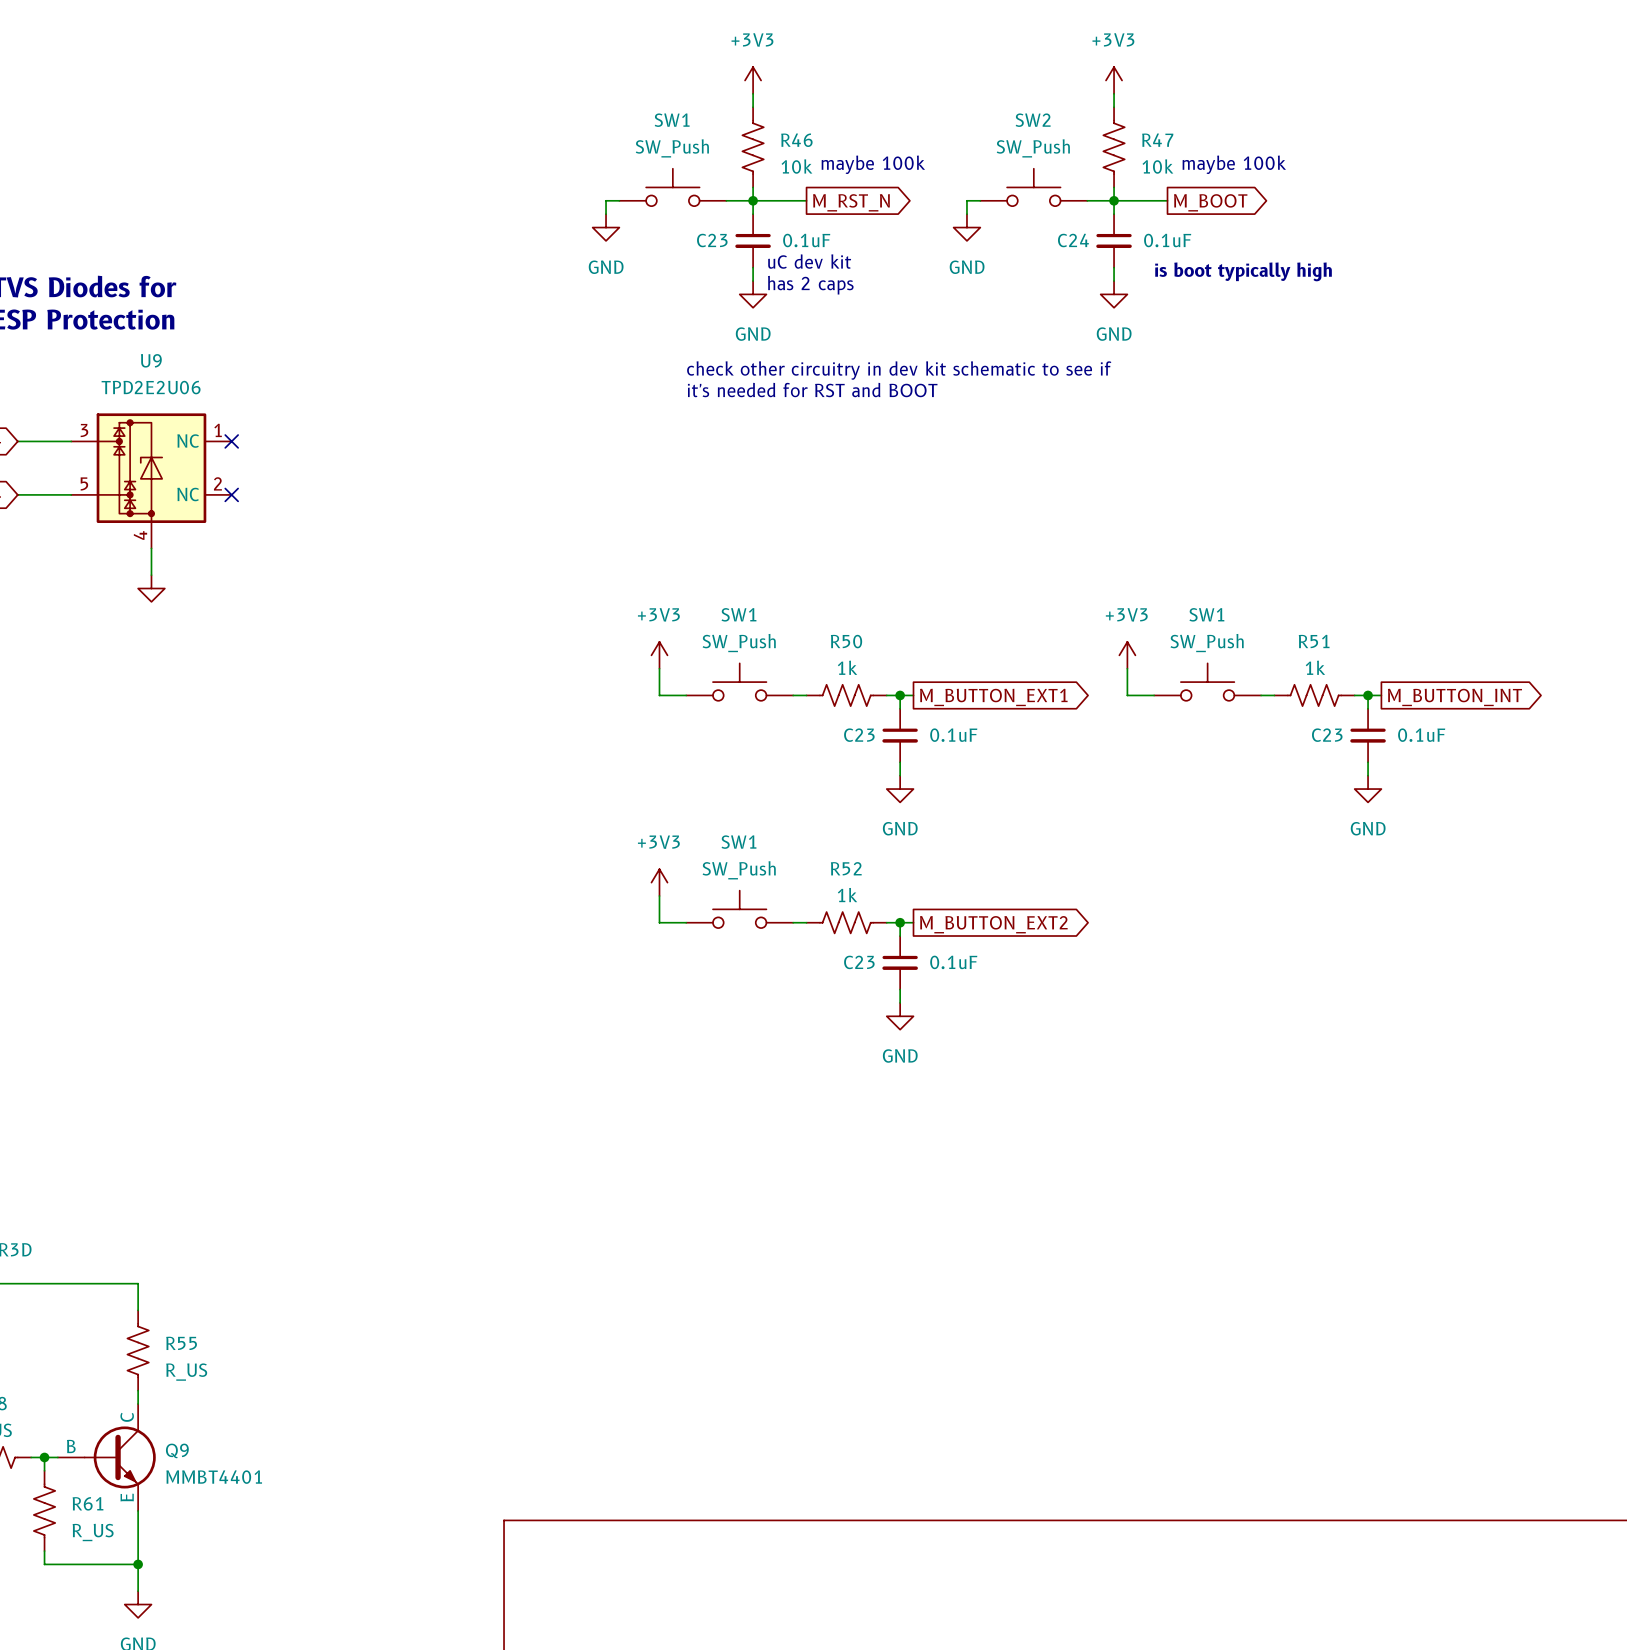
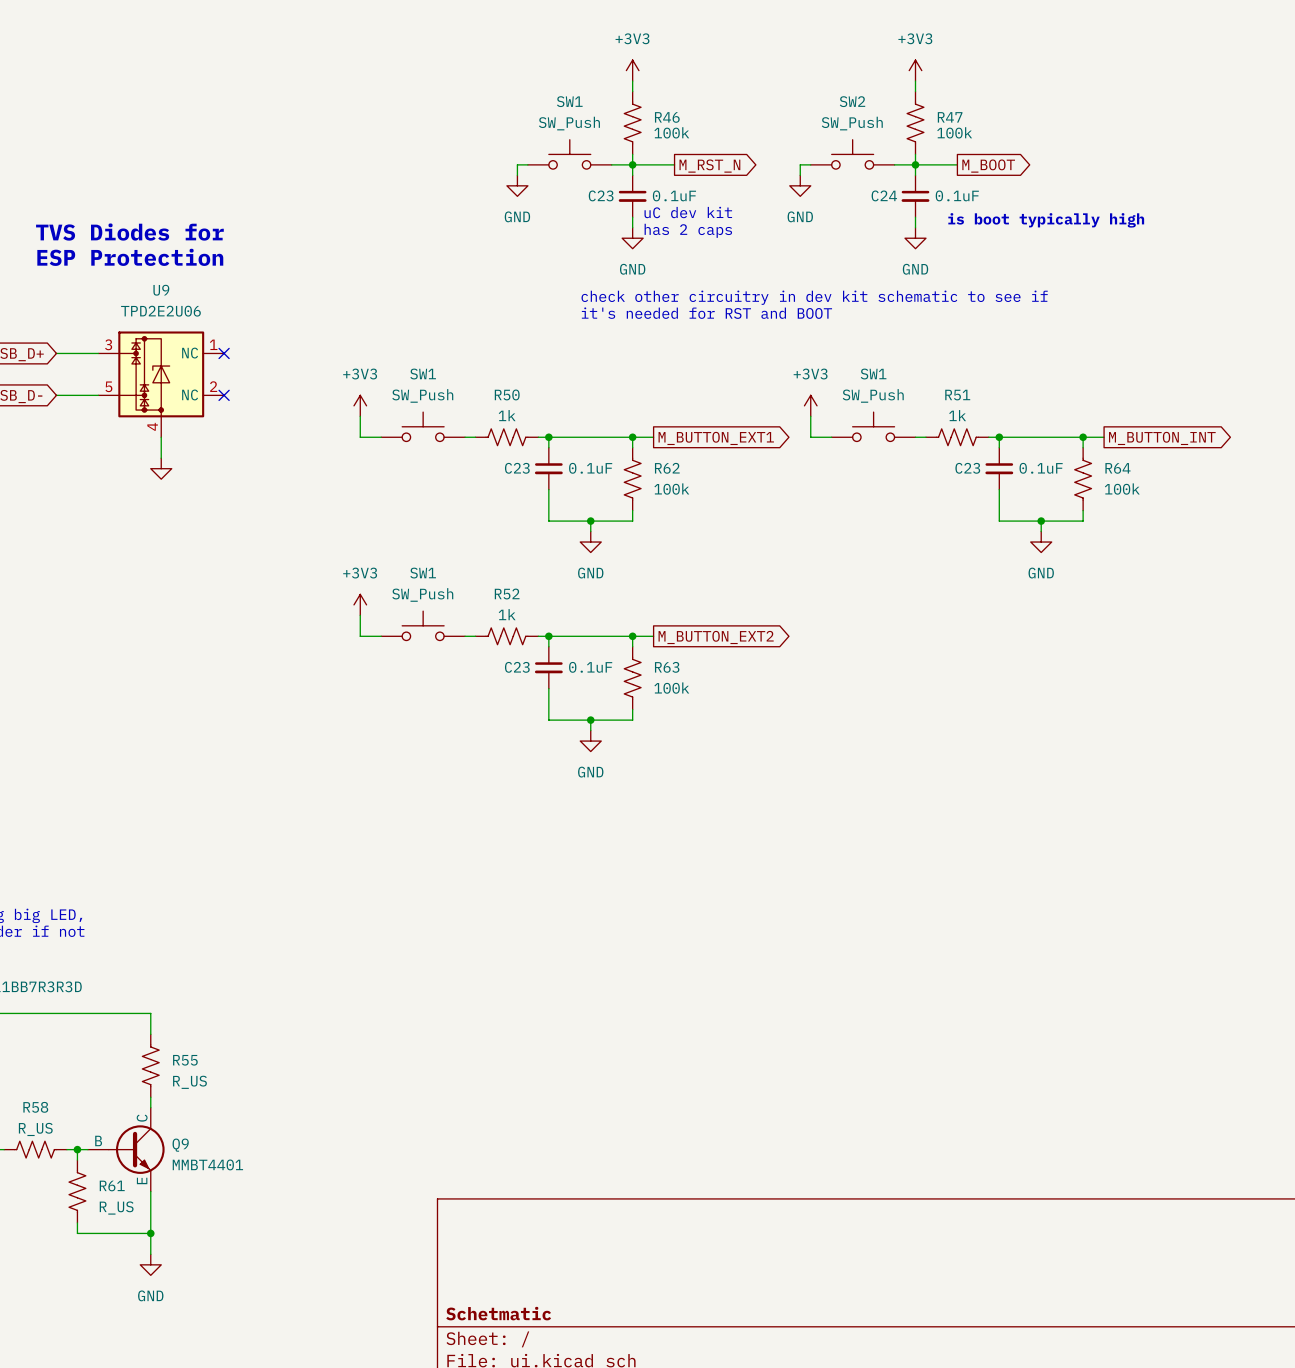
text: maybe 100k (873, 164) -> none
text: maybe 100k (1234, 164) -> none
R46 value: 10k (796, 166) -> 100k (671, 132)
R47 value: 10k (1157, 166) -> 100k (954, 132)
power symbol: none -> +3V3 (360, 405)
power symbol: none -> +3V3 (810, 405)
wire: none -> (360, 416) (360, 437) (381, 437)
SW1: none -> SW_Push (423, 426)
SW1: none -> SW_Push (873, 426)
wire: none -> (465, 437) (475, 437)
wire: none -> (538, 437) (653, 437)
wire: none -> (548, 437) (548, 447)
junction: none -> (548, 437)
junction: none -> (632, 437)
wire: none -> (988, 437) (1104, 437)
junction: none -> (999, 437)
wire: none -> (1083, 437) (1083, 447)
junction: none -> (1083, 437)
C23: none -> 0.1uF (548, 468)
C23: none -> 0.1uF (999, 468)
R62: none -> 100k (632, 479)
R64: none -> 100k (1083, 479)
wire: none -> (548, 489) (548, 521) (632, 521) (632, 510)
wire: none -> (999, 489) (999, 521) (1083, 521) (1083, 510)
power symbol: +3V3 (659, 655) -> none
wire: none -> (590, 521) (590, 531)
junction: none -> (590, 521)
power symbol: +3V3 (1127, 655) -> none
junction: none -> (1041, 521)
wire: (659, 668) (659, 695) (686, 695) -> none
wire: (1127, 668) (1127, 695) (1154, 695) -> (810, 416) (810, 437) (831, 437)
power symbol: none -> GND (590, 542)
SW1: SW_Push (739, 682) -> none
SW1: SW_Push (1207, 682) -> none
wire: (793, 695) (806, 695) -> none
R50 position: (846, 695) -> (506, 437)
wire: (886, 695) (913, 695) -> none
wire: (900, 695) (900, 708) -> (632, 437) (632, 447)
junction: (900, 695) -> none
wire: (1261, 695) (1274, 695) -> (915, 437) (925, 437)
R51 position: (1314, 695) -> (957, 437)
wire: (1354, 695) (1381, 695) -> none
wire: (1368, 695) (1368, 708) -> (999, 437) (999, 447)
junction: (1368, 695) -> none
global label position: M_BUTTON_EXT1 (993, 697) -> M_BUTTON_EXT1 (716, 438)
global label position: M_BUTTON_INT (1454, 697) -> M_BUTTON_INT (1162, 438)
C23: 0.1uF (900, 735) -> none
C23: 0.1uF (1368, 735) -> none
power symbol: none -> +3V3 (360, 604)
wire: (900, 762) (900, 775) -> (632, 636) (632, 646)
wire: (1368, 762) (1368, 775) -> (1041, 521) (1041, 531)
wire: none -> (360, 615) (360, 636) (381, 636)
SW1: none -> SW_Push (423, 625)
power symbol: GND (900, 789) -> none
power symbol position: GND (1368, 789) -> GND (1041, 542)
wire: none -> (465, 636) (475, 636)
wire: none -> (538, 636) (653, 636)
wire: none -> (548, 636) (548, 646)
junction: none -> (548, 636)
junction: none -> (632, 636)
C23: none -> 0.1uF (548, 667)
R63: none -> 100k (632, 678)
wire: none -> (548, 688) (548, 720) (632, 720) (632, 709)
power symbol: +3V3 (659, 882) -> none
wire: (659, 895) (659, 922) (686, 922) -> none
junction: none -> (590, 720)
SW1: SW_Push (739, 909) -> none
wire: (793, 922) (806, 922) -> none
R52 position: (846, 922) -> (506, 636)
wire: (886, 922) (913, 922) -> none
wire: (900, 922) (900, 936) -> (590, 720) (590, 730)
junction: (900, 922) -> none
global label position: M_BUTTON_EXT2 (993, 924) -> M_BUTTON_EXT2 (716, 637)
power symbol: none -> GND (590, 741)
C23: 0.1uF (900, 962) -> none
wire: (900, 989) (900, 1002) -> none
power symbol: GND (900, 1016) -> none

